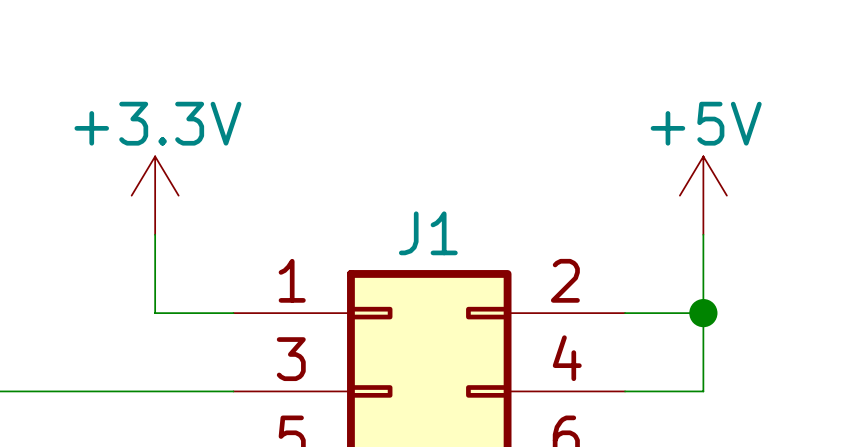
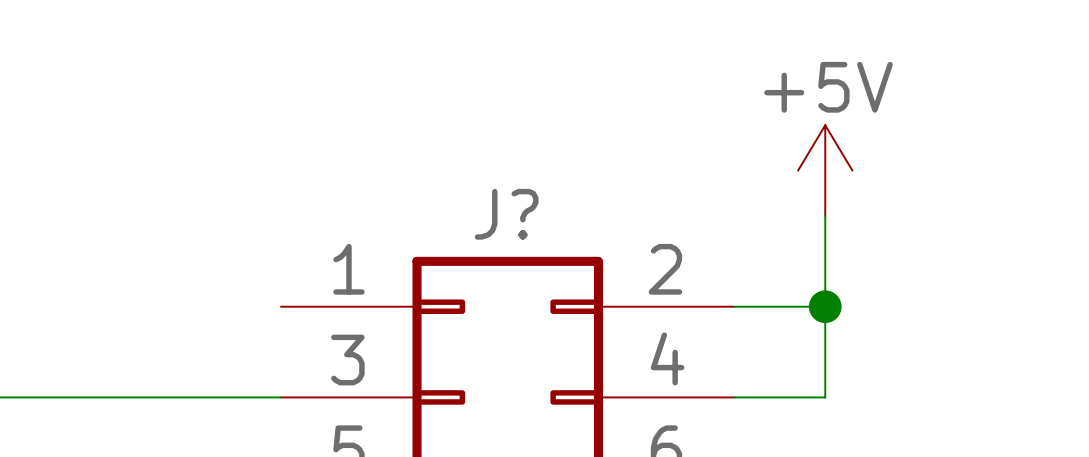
power symbol: +3.3V (155, 195) -> none
J1 name: J1 (428, 233) -> J? (506, 214)
wire: (155, 234) (155, 313) (233, 313) -> none

